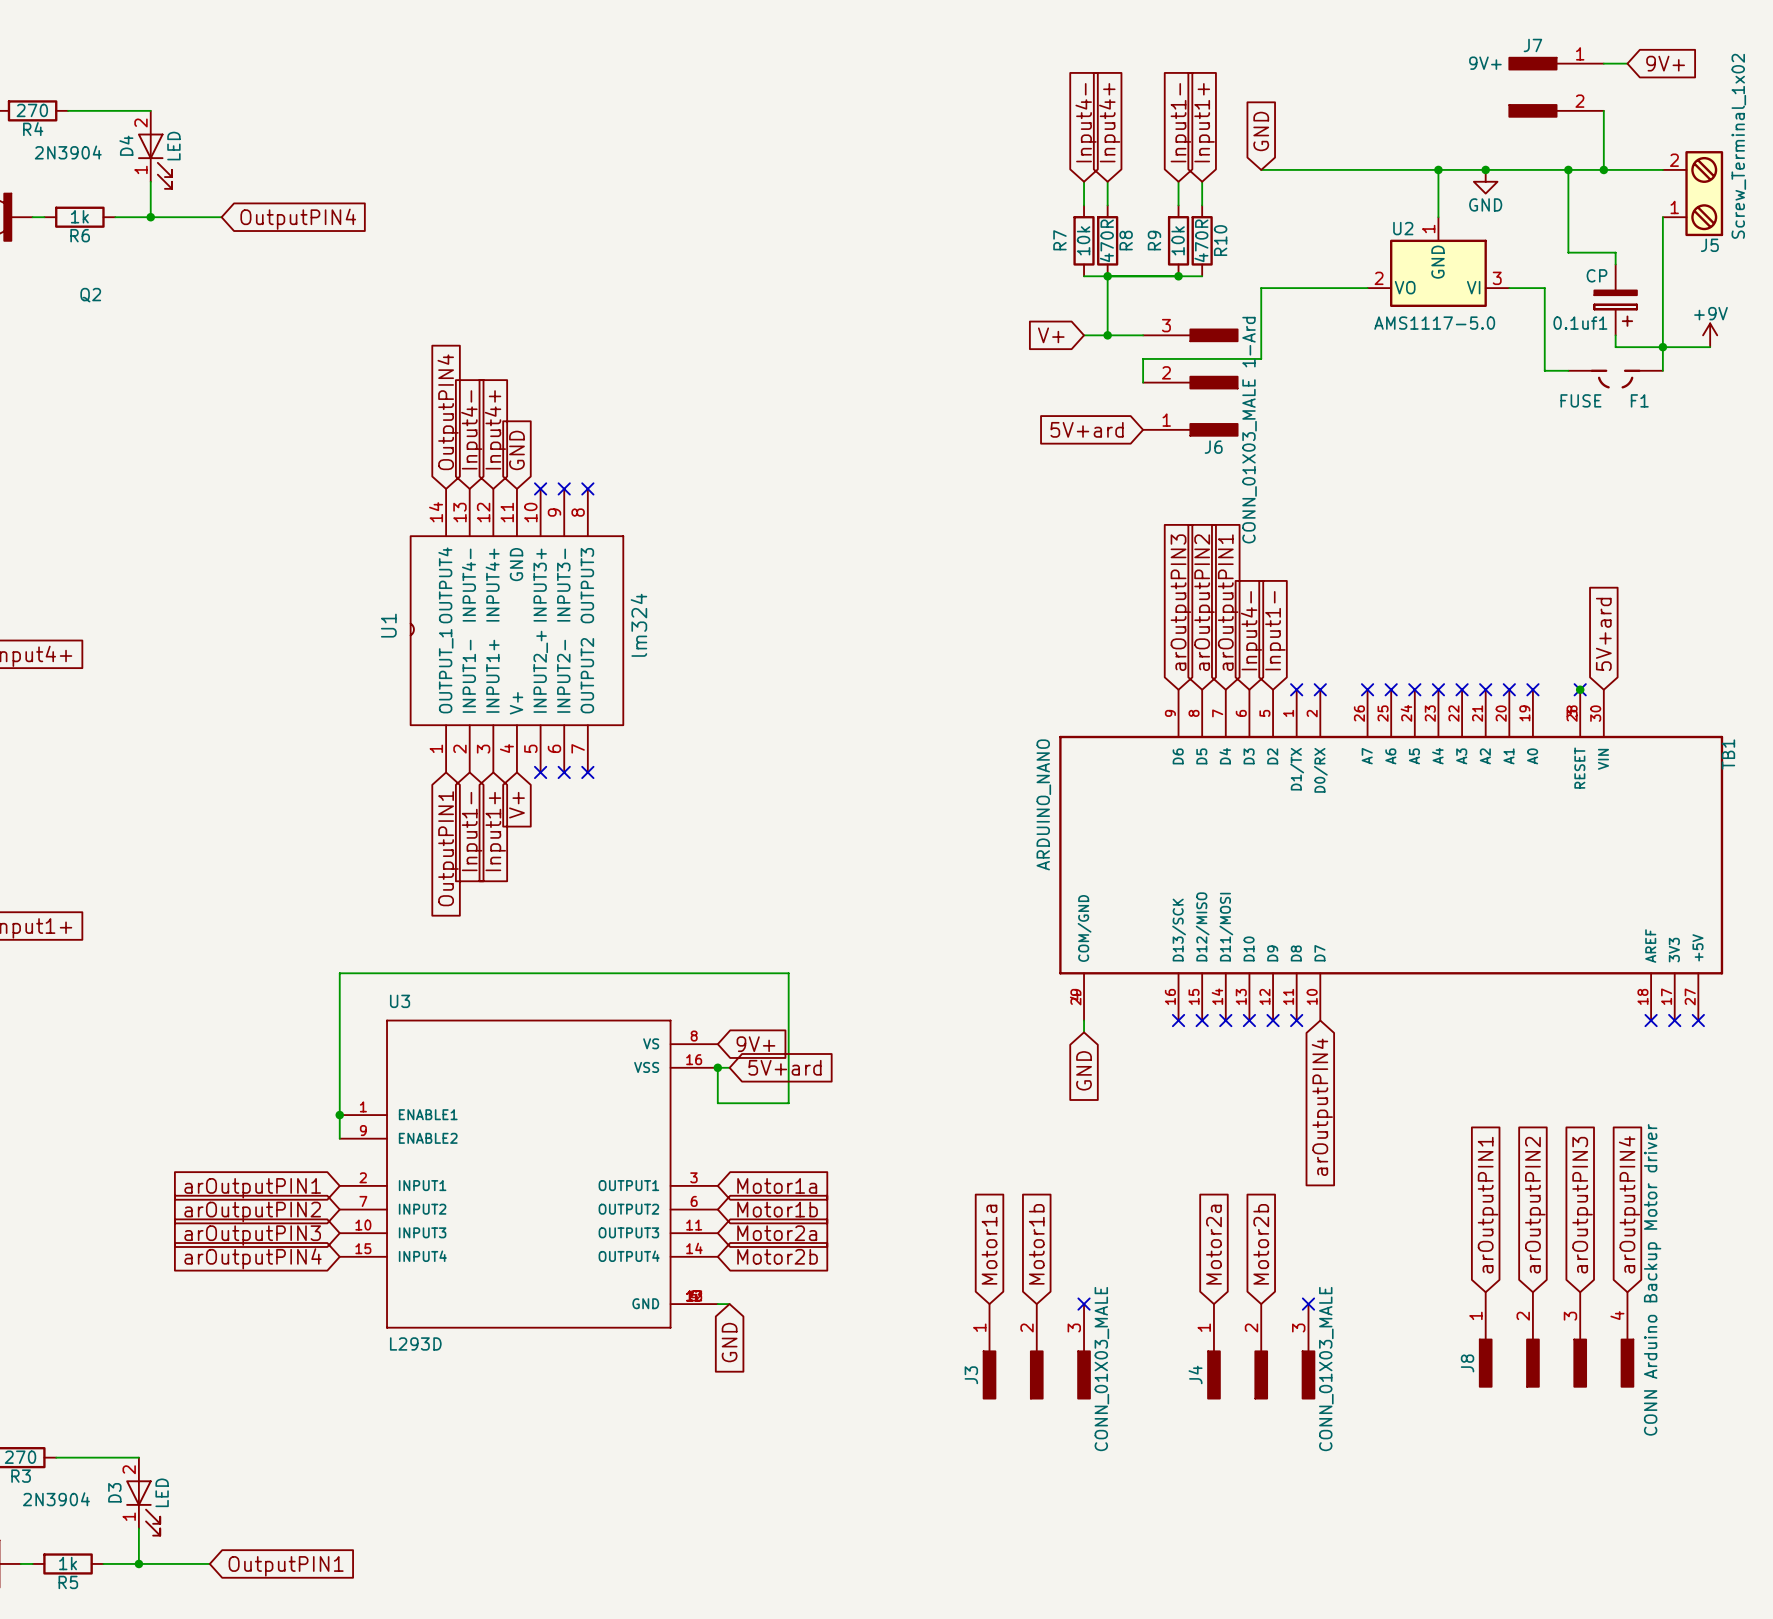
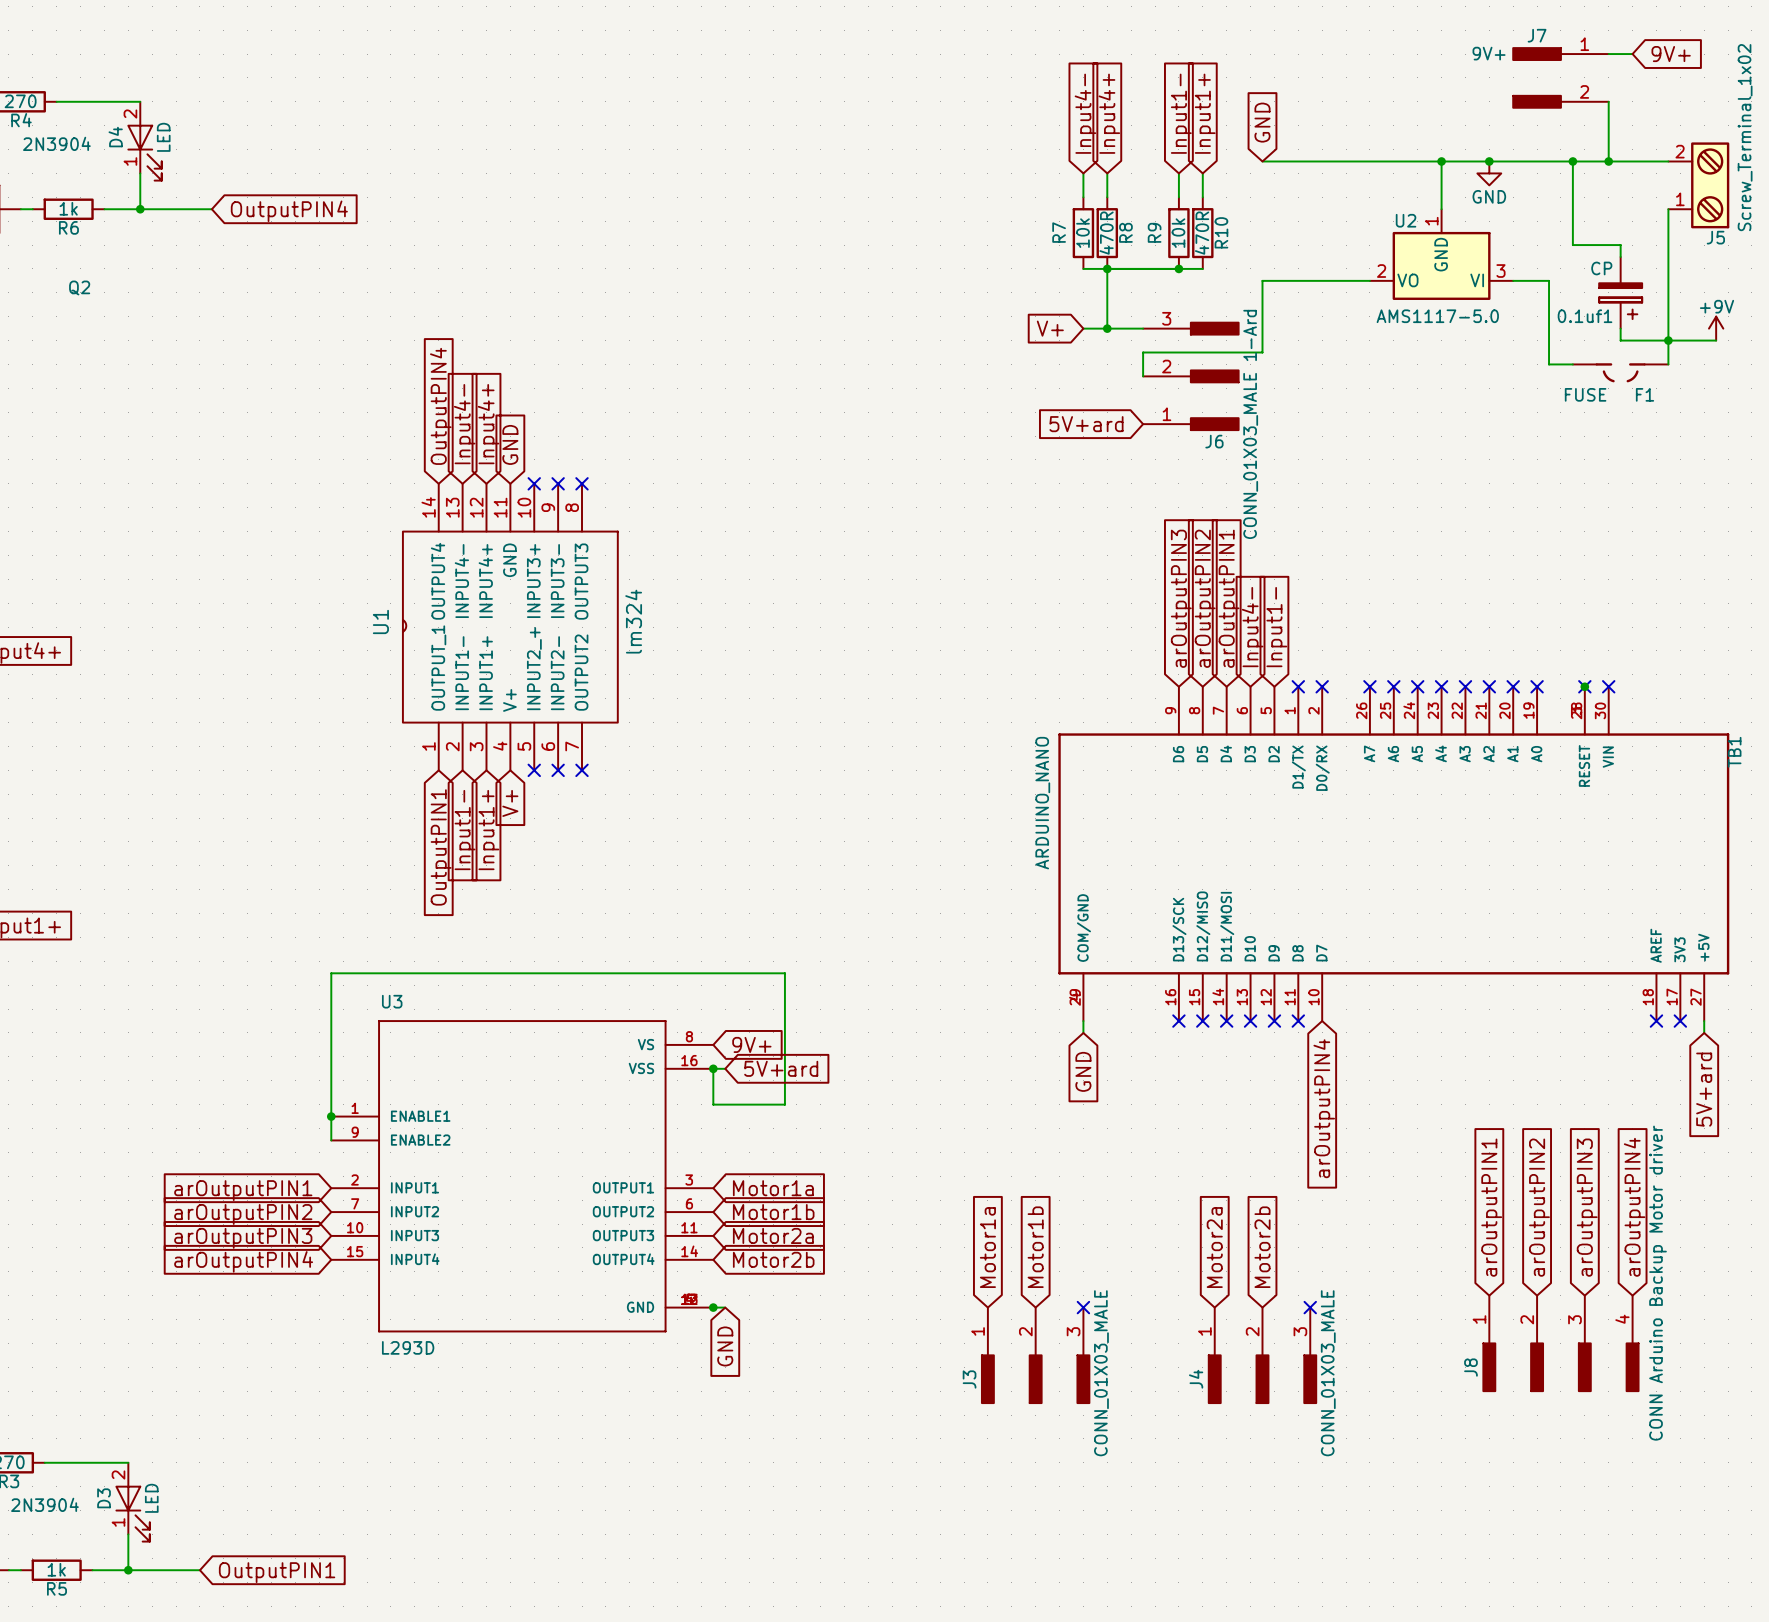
global label: 5V+ard (1603, 634) -> none
no-connect mark: none -> (1608, 686)
wire: none -> (1704, 1021) (1704, 1032)
no-connect mark: (1698, 1020) -> none
global label: none -> 5V+ard (1704, 1089)
junction: none -> (713, 1307)

